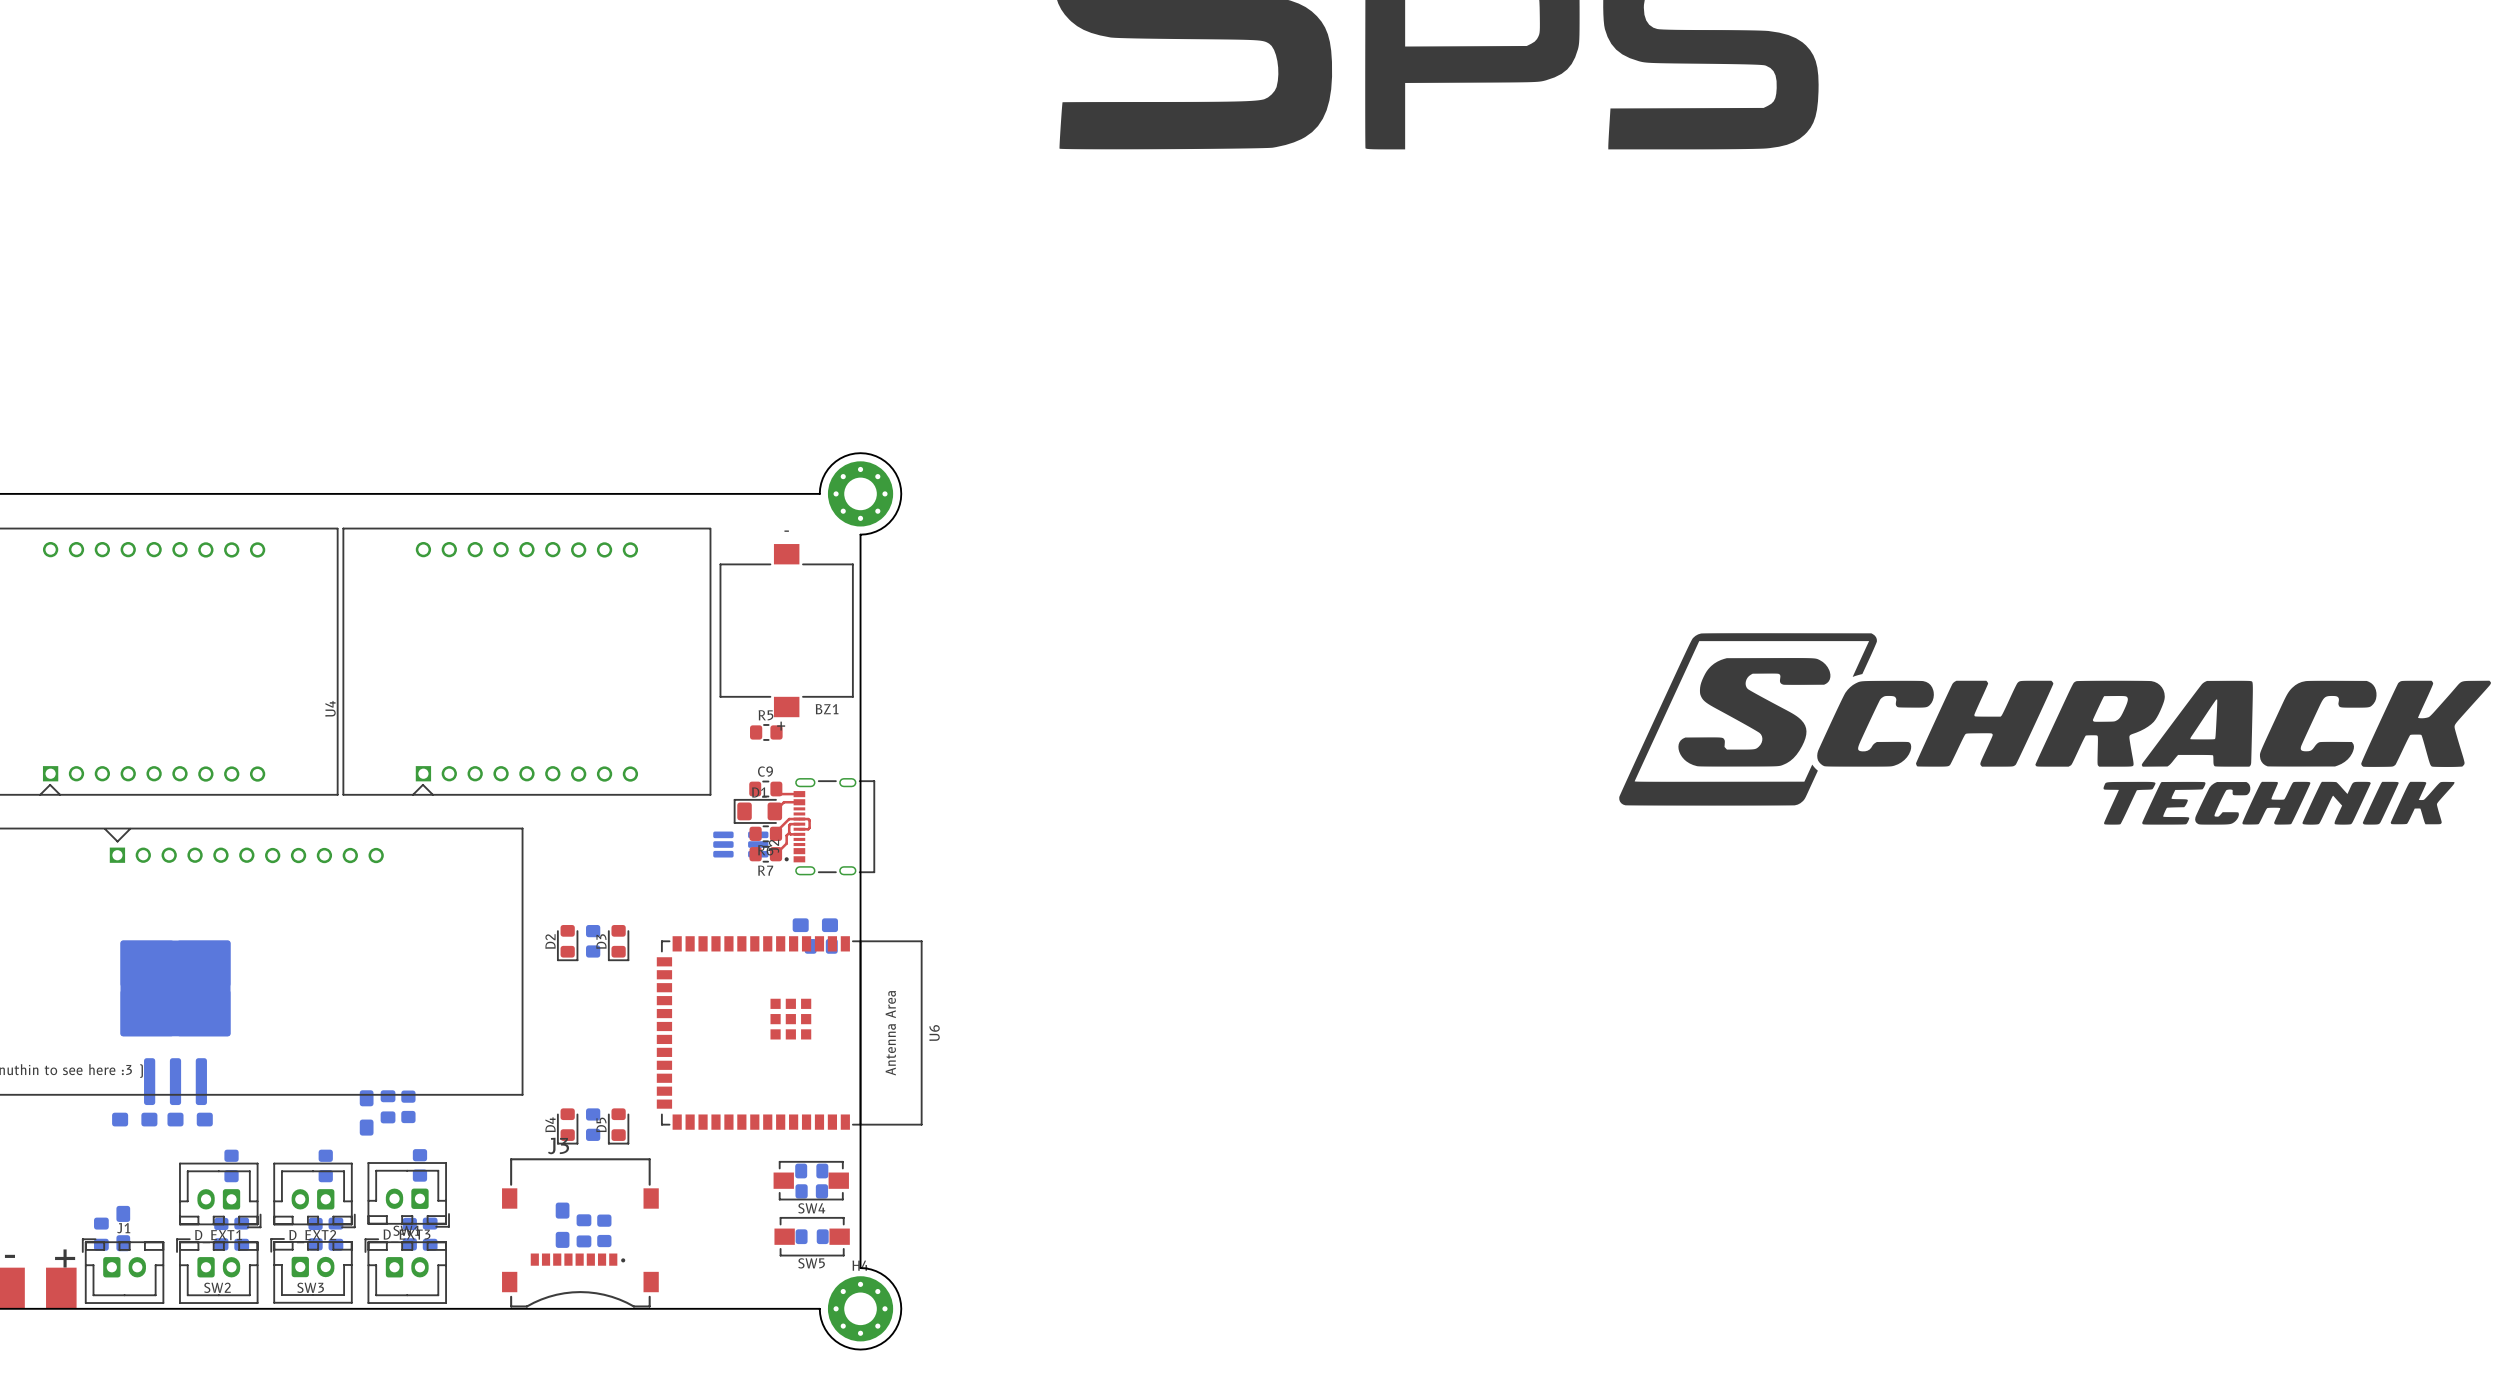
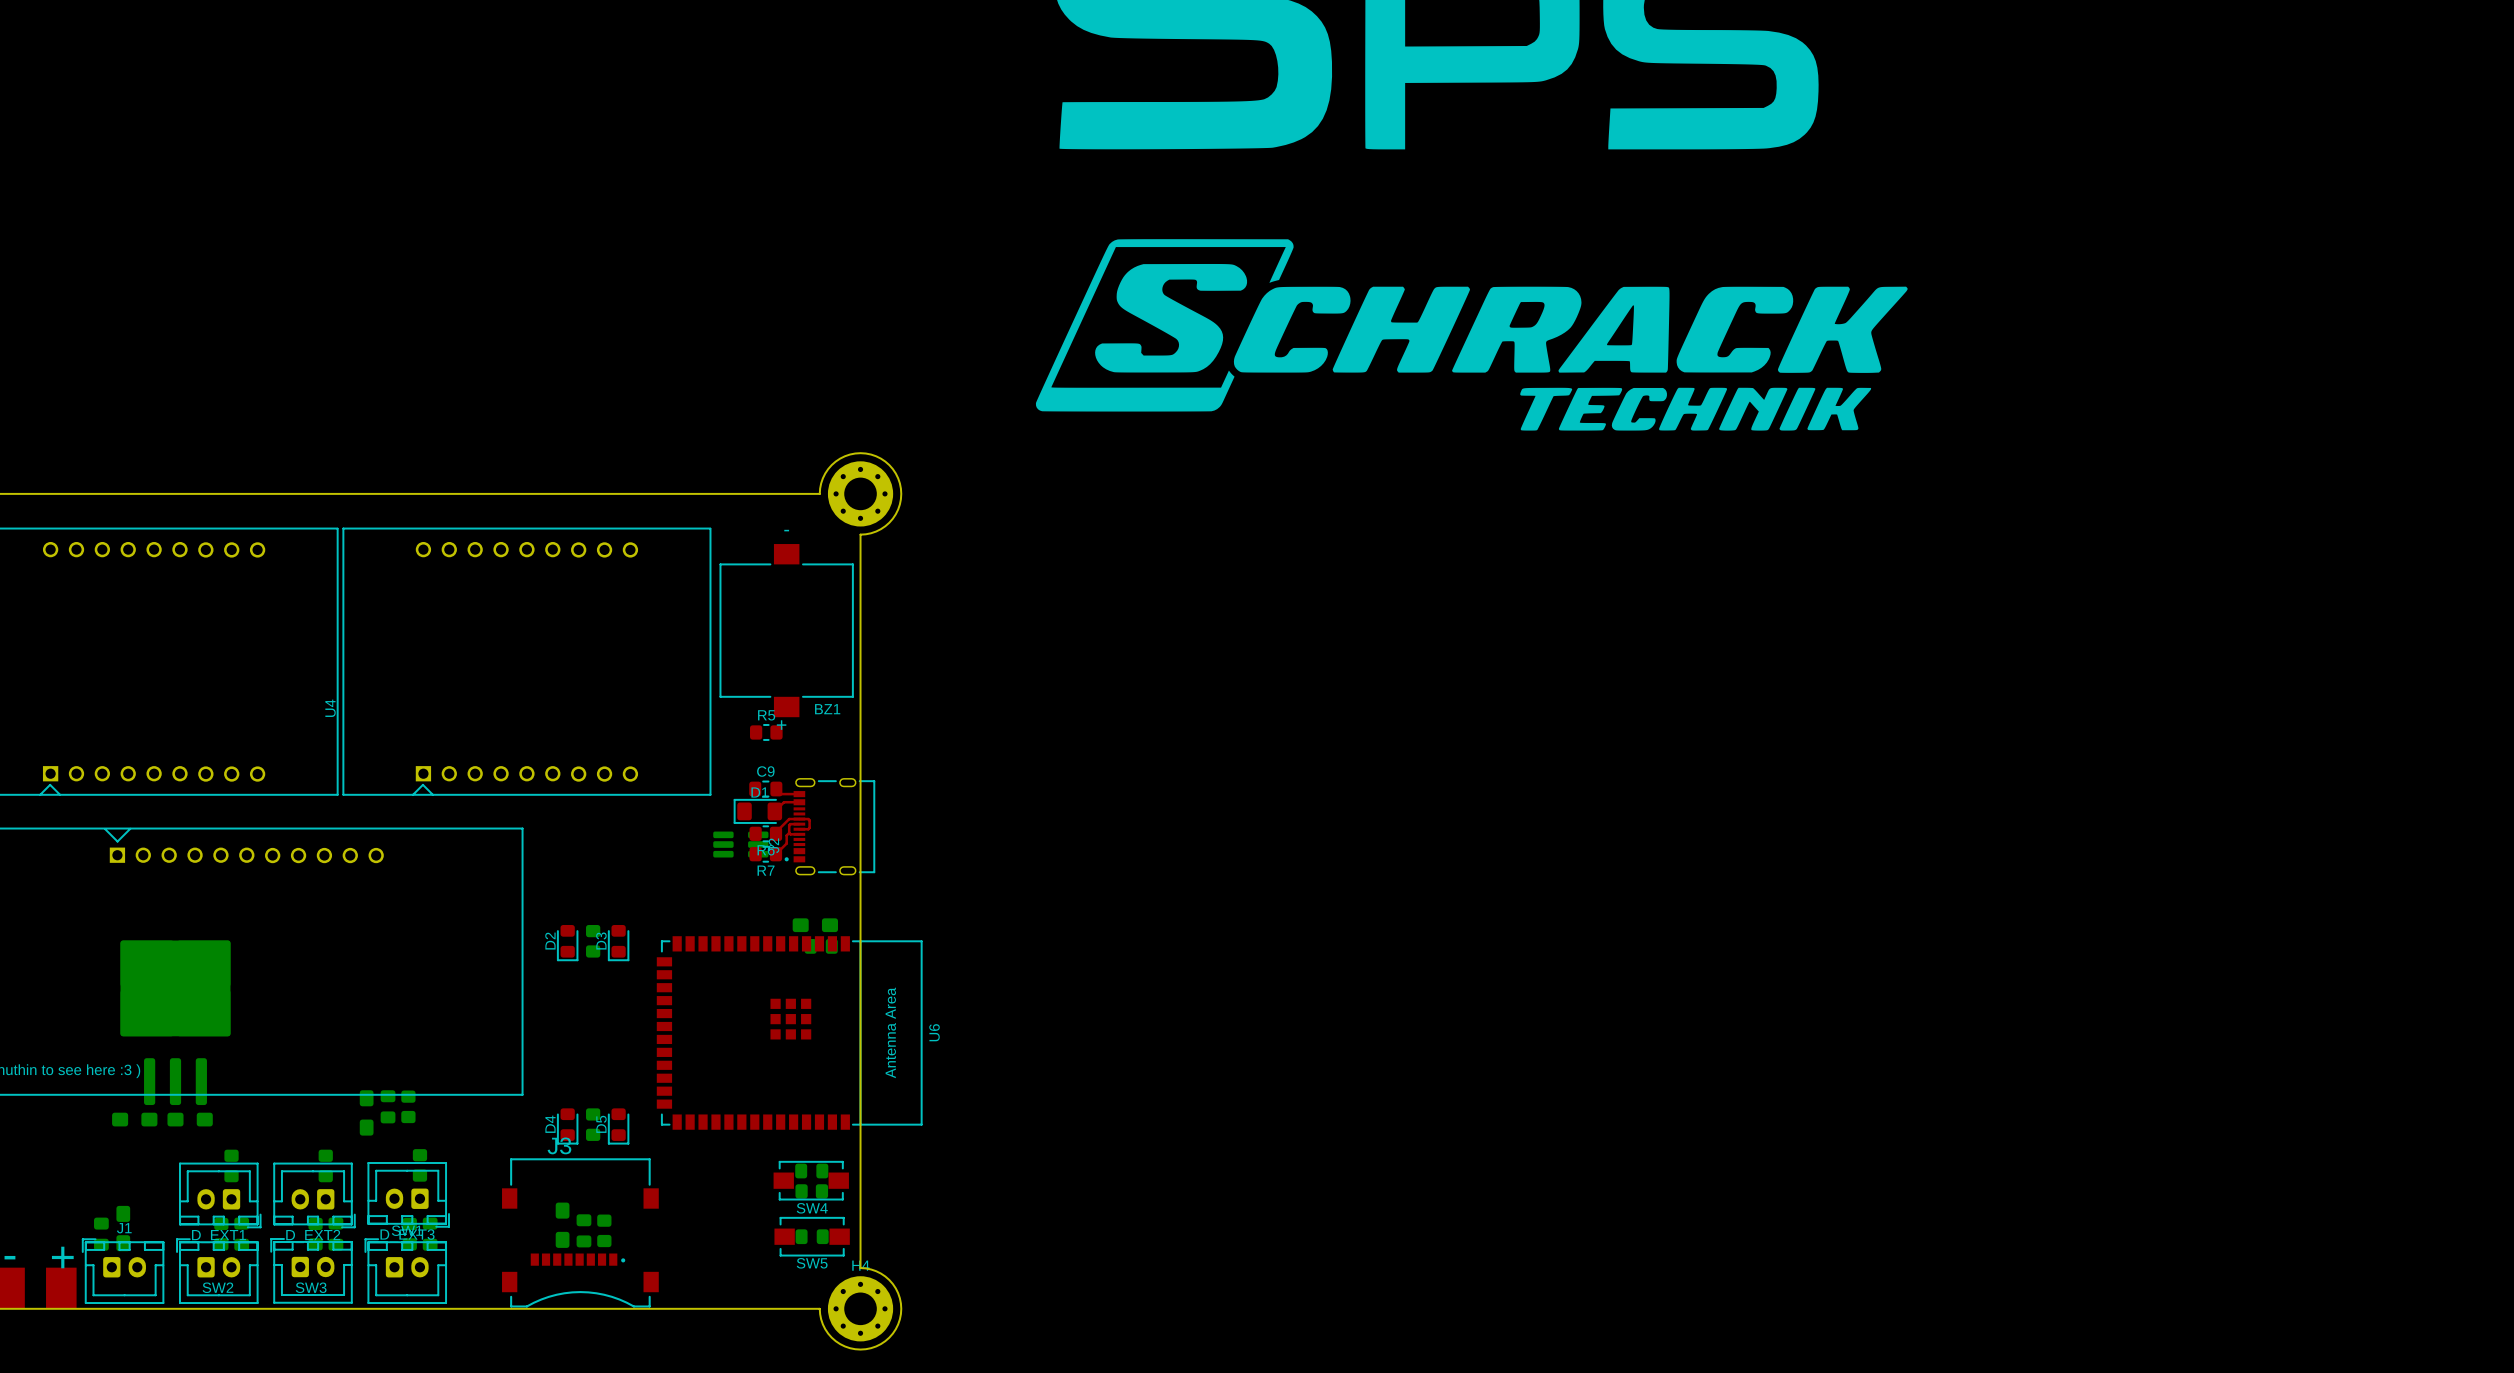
drawing: none -> [1035, 239, 1908, 431]
drawing: [1619, 633, 2491, 825] -> none

